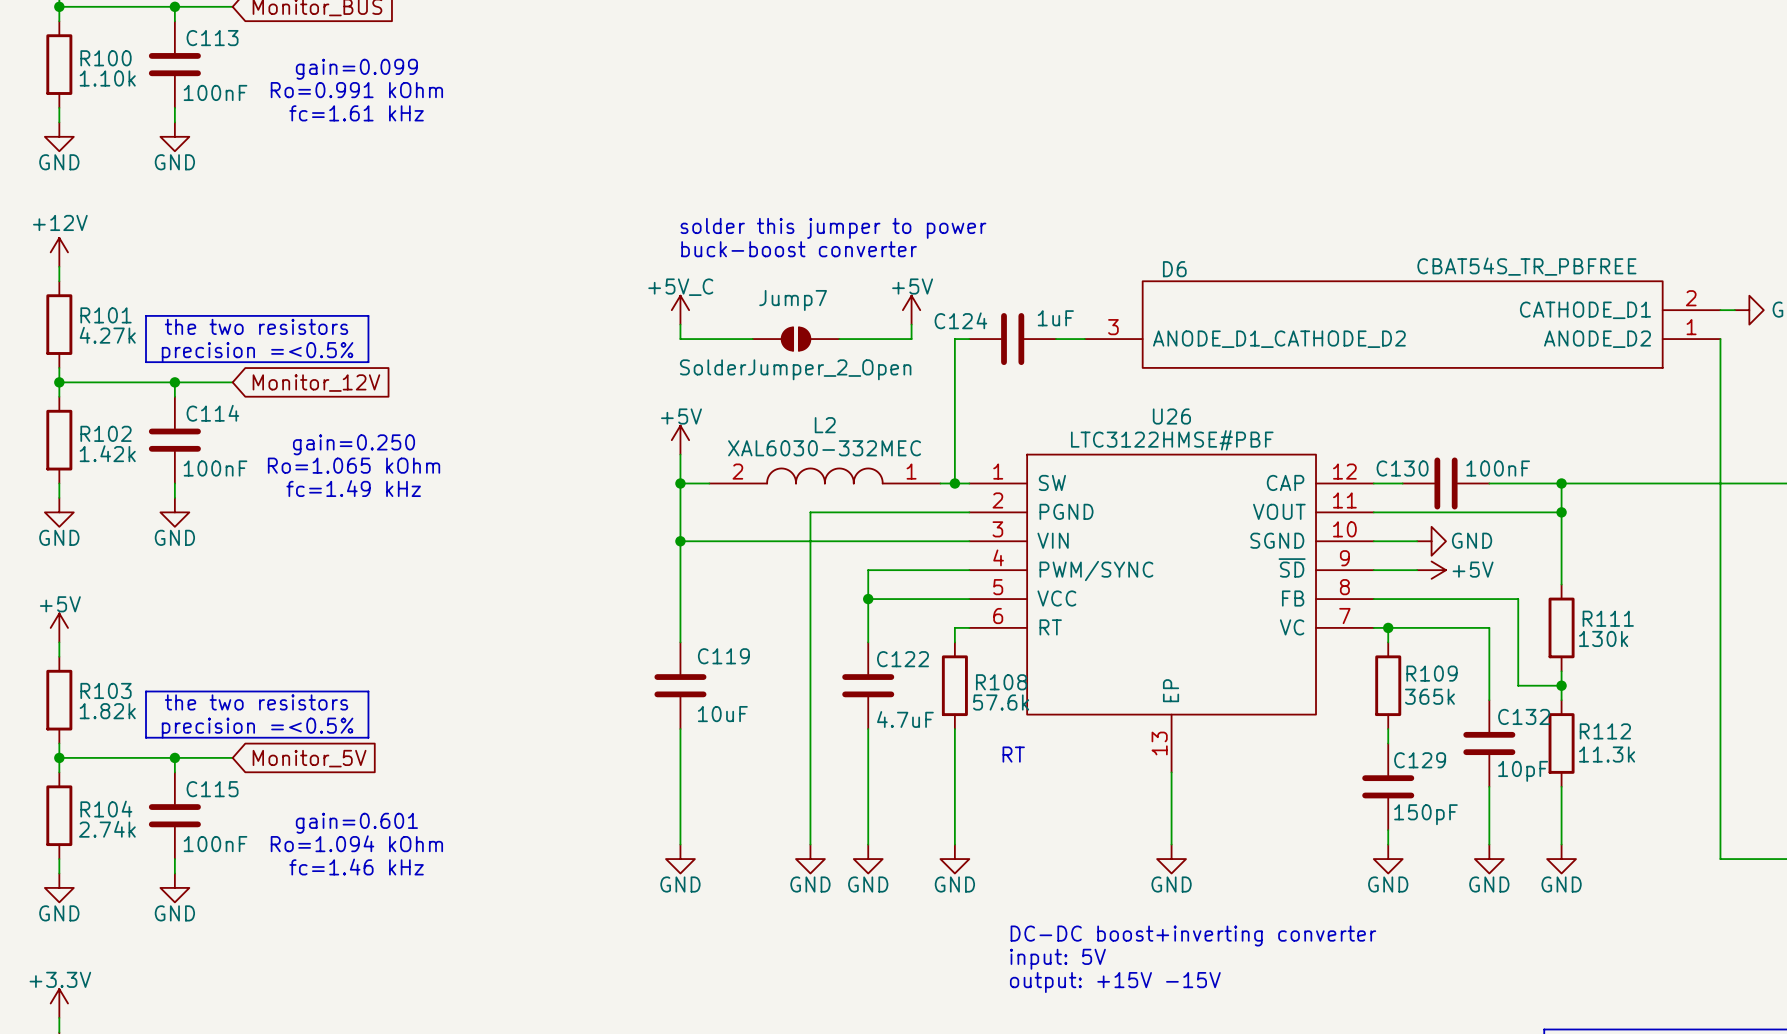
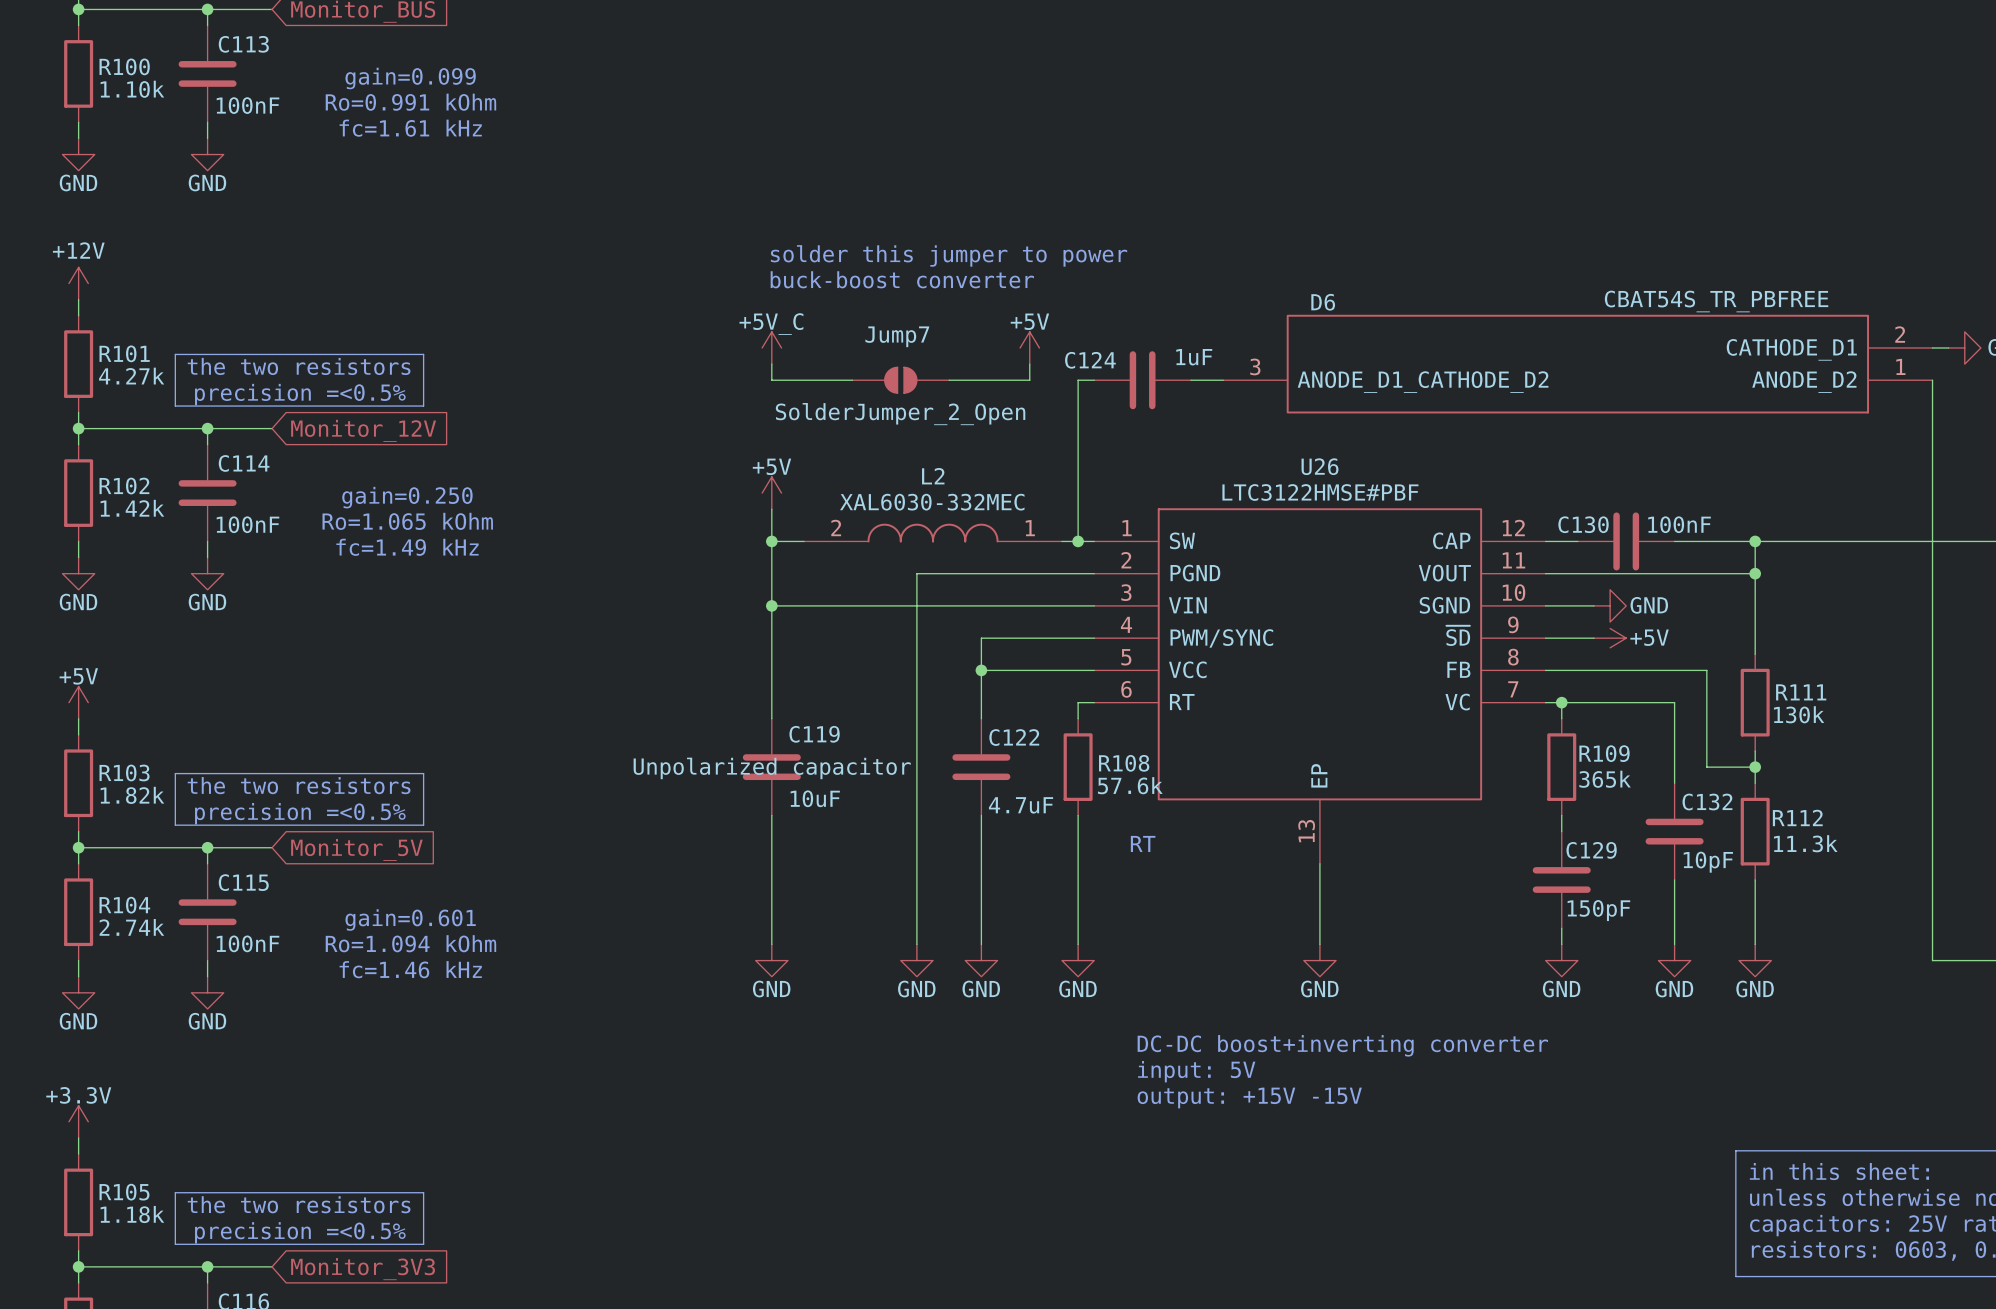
C119 text: none -> Unpolarized capacitor (772, 768)

